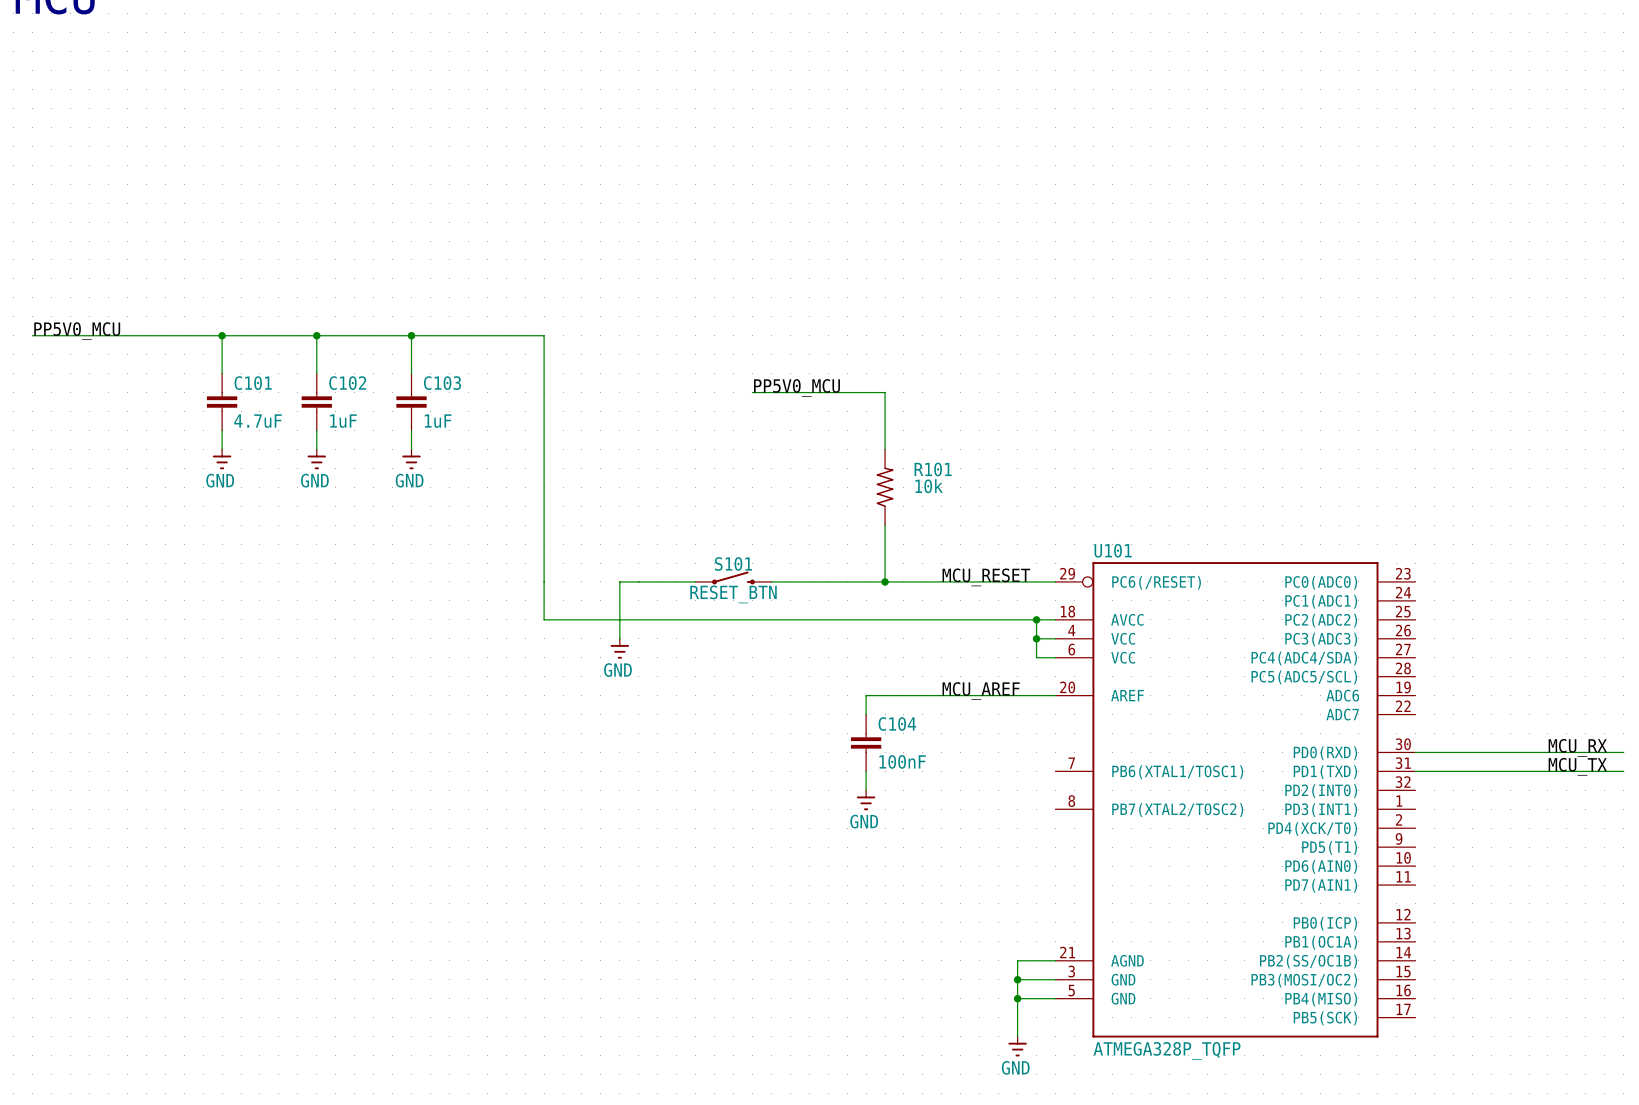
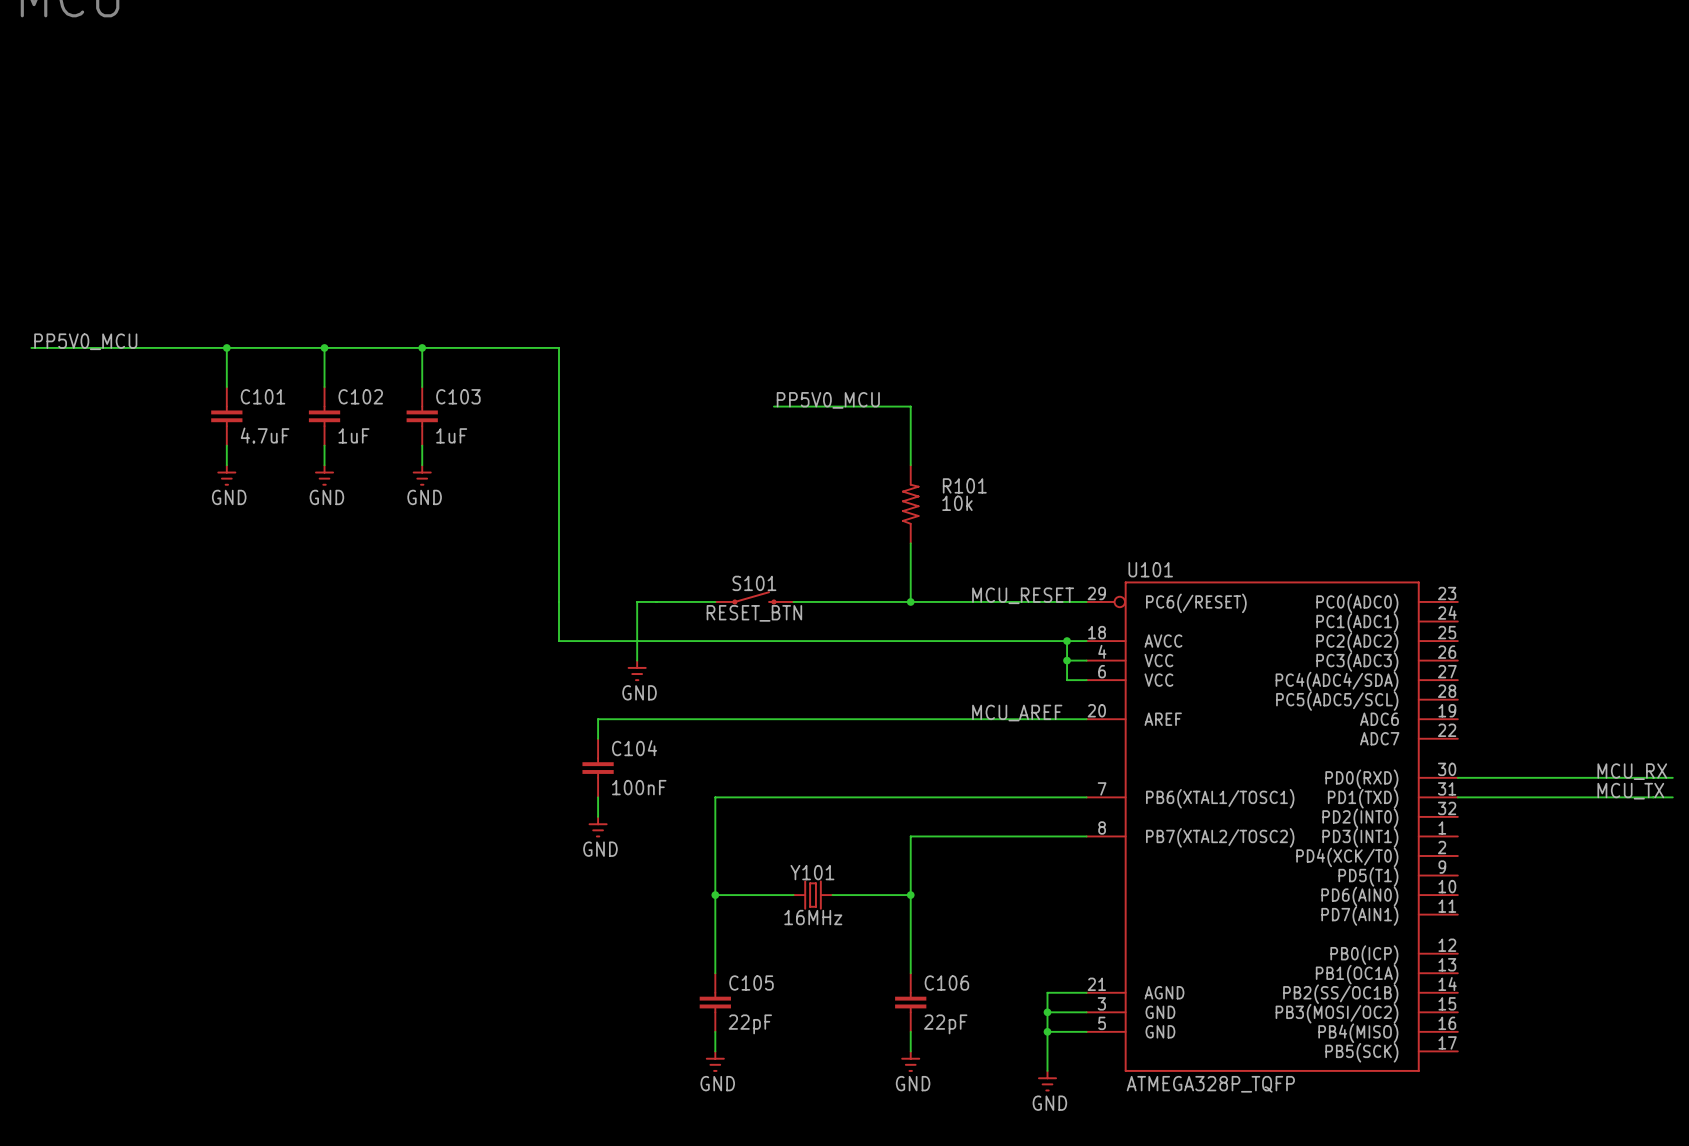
wire: (866, 695) (866, 714) -> (891, 719) (598, 719) (598, 738)
C104 position: (866, 742) -> (598, 768)
wire: none -> (598, 797) (598, 816)
wire: (866, 771) (866, 790) -> none
wire: none -> (1086, 797) (715, 797) (715, 973)
power symbol: none -> GND (598, 826)
power symbol: GND (866, 799) -> none
wire: none -> (1086, 836) (910, 836) (910, 973)
wire: none -> (715, 895) (793, 895)
junction: none -> (715, 895)
Y101: none -> 16MHz (813, 895)
wire: none -> (832, 895) (910, 895)
junction: none -> (910, 895)
C105: none -> 22pF (715, 1002)
C106: none -> 22pF (910, 1002)
wire: none -> (715, 1031) (715, 1051)
wire: none -> (910, 1031) (910, 1051)
power symbol: none -> GND (715, 1061)
power symbol: none -> GND (910, 1061)

